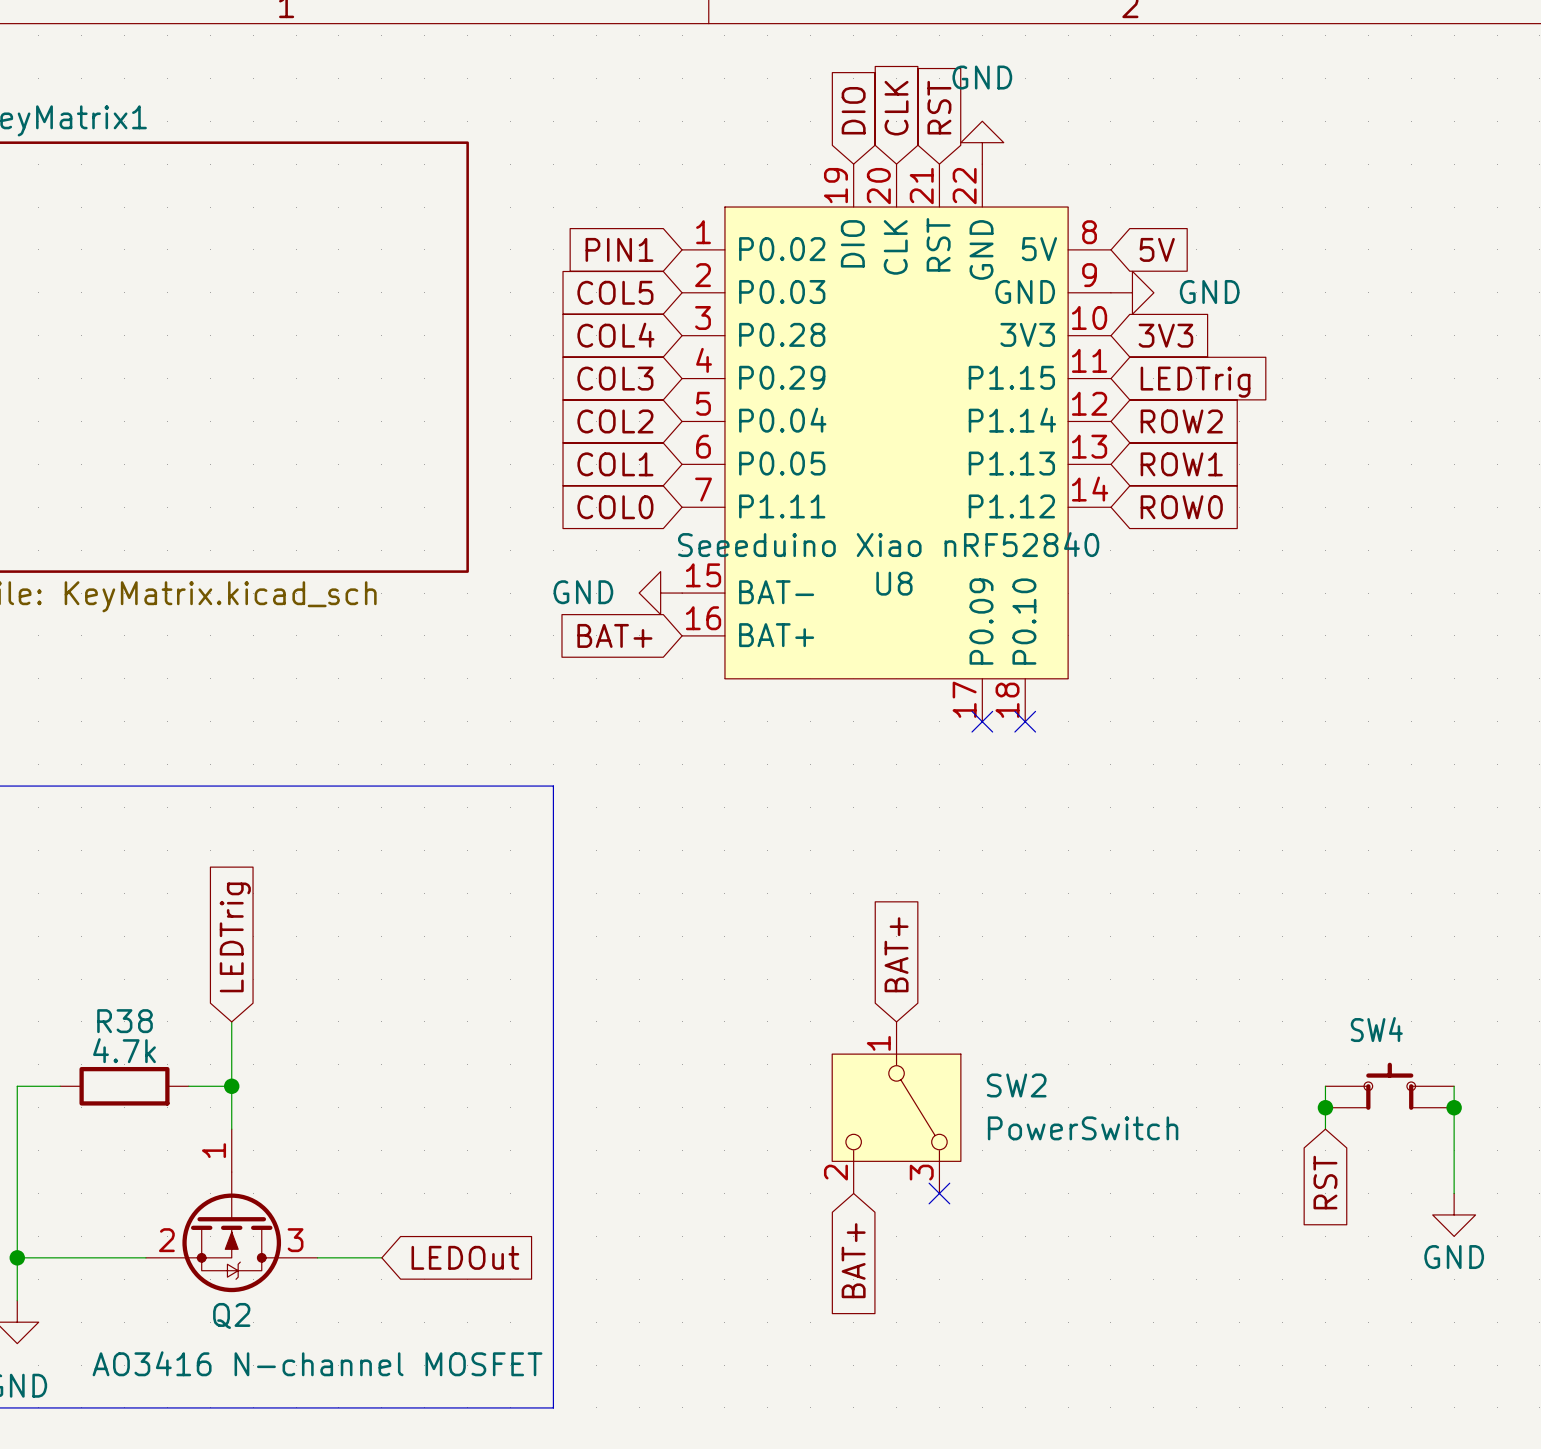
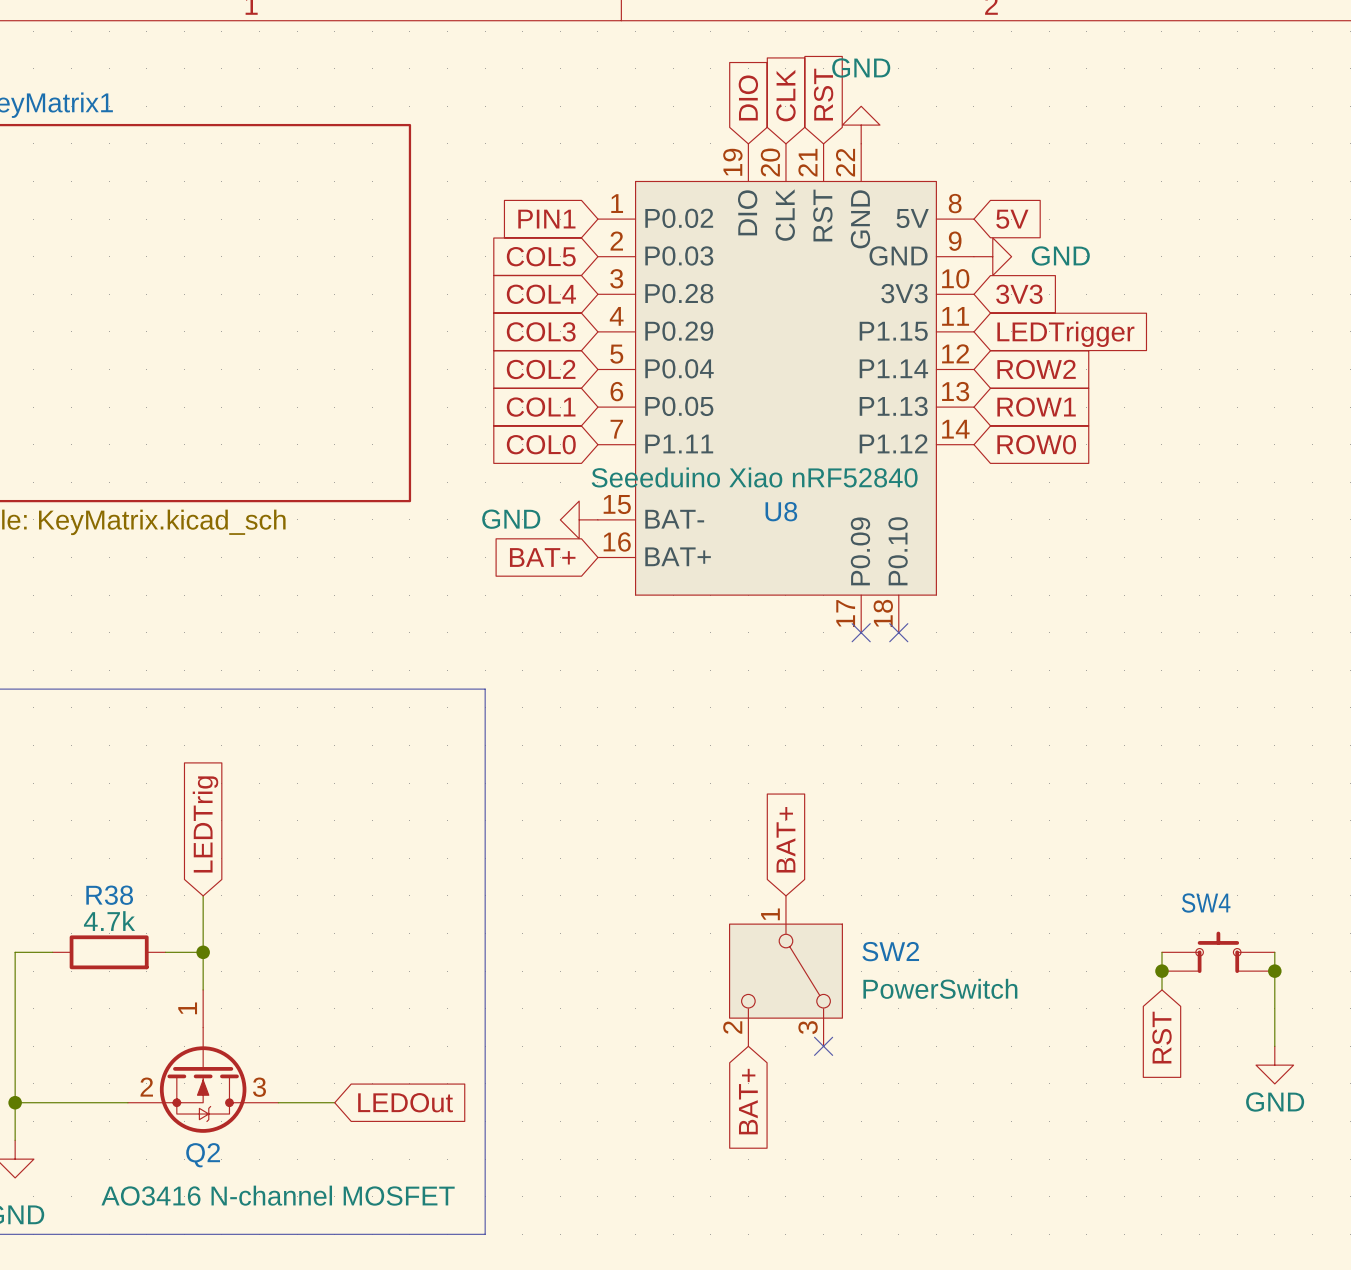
global label: LEDTrig (1195, 382) -> LEDTrigger (1065, 334)

